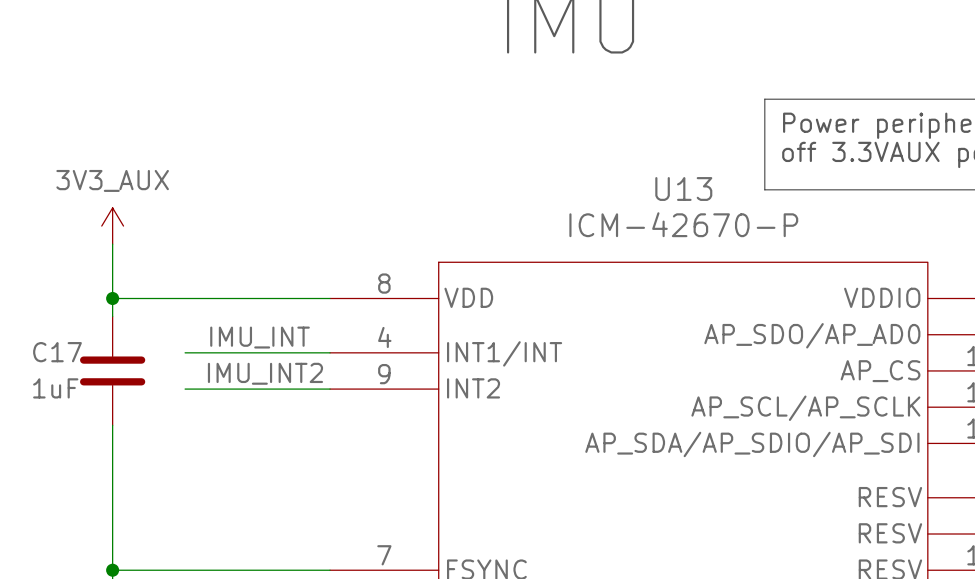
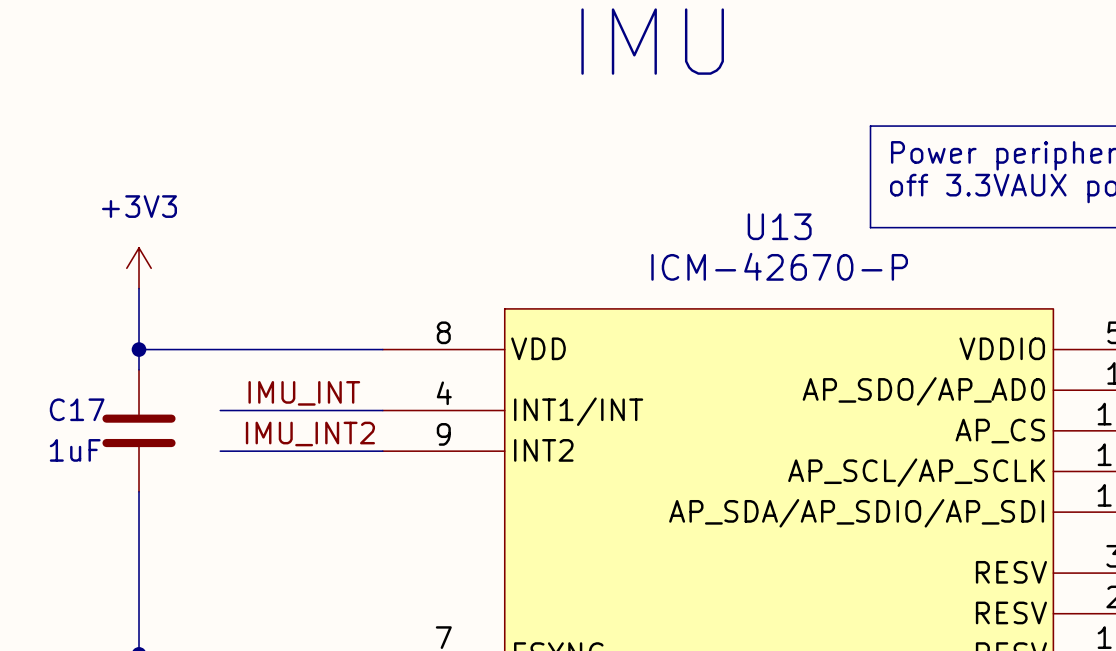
power symbol: 3V3_AUX (112, 226) -> +3V3 (139, 268)

